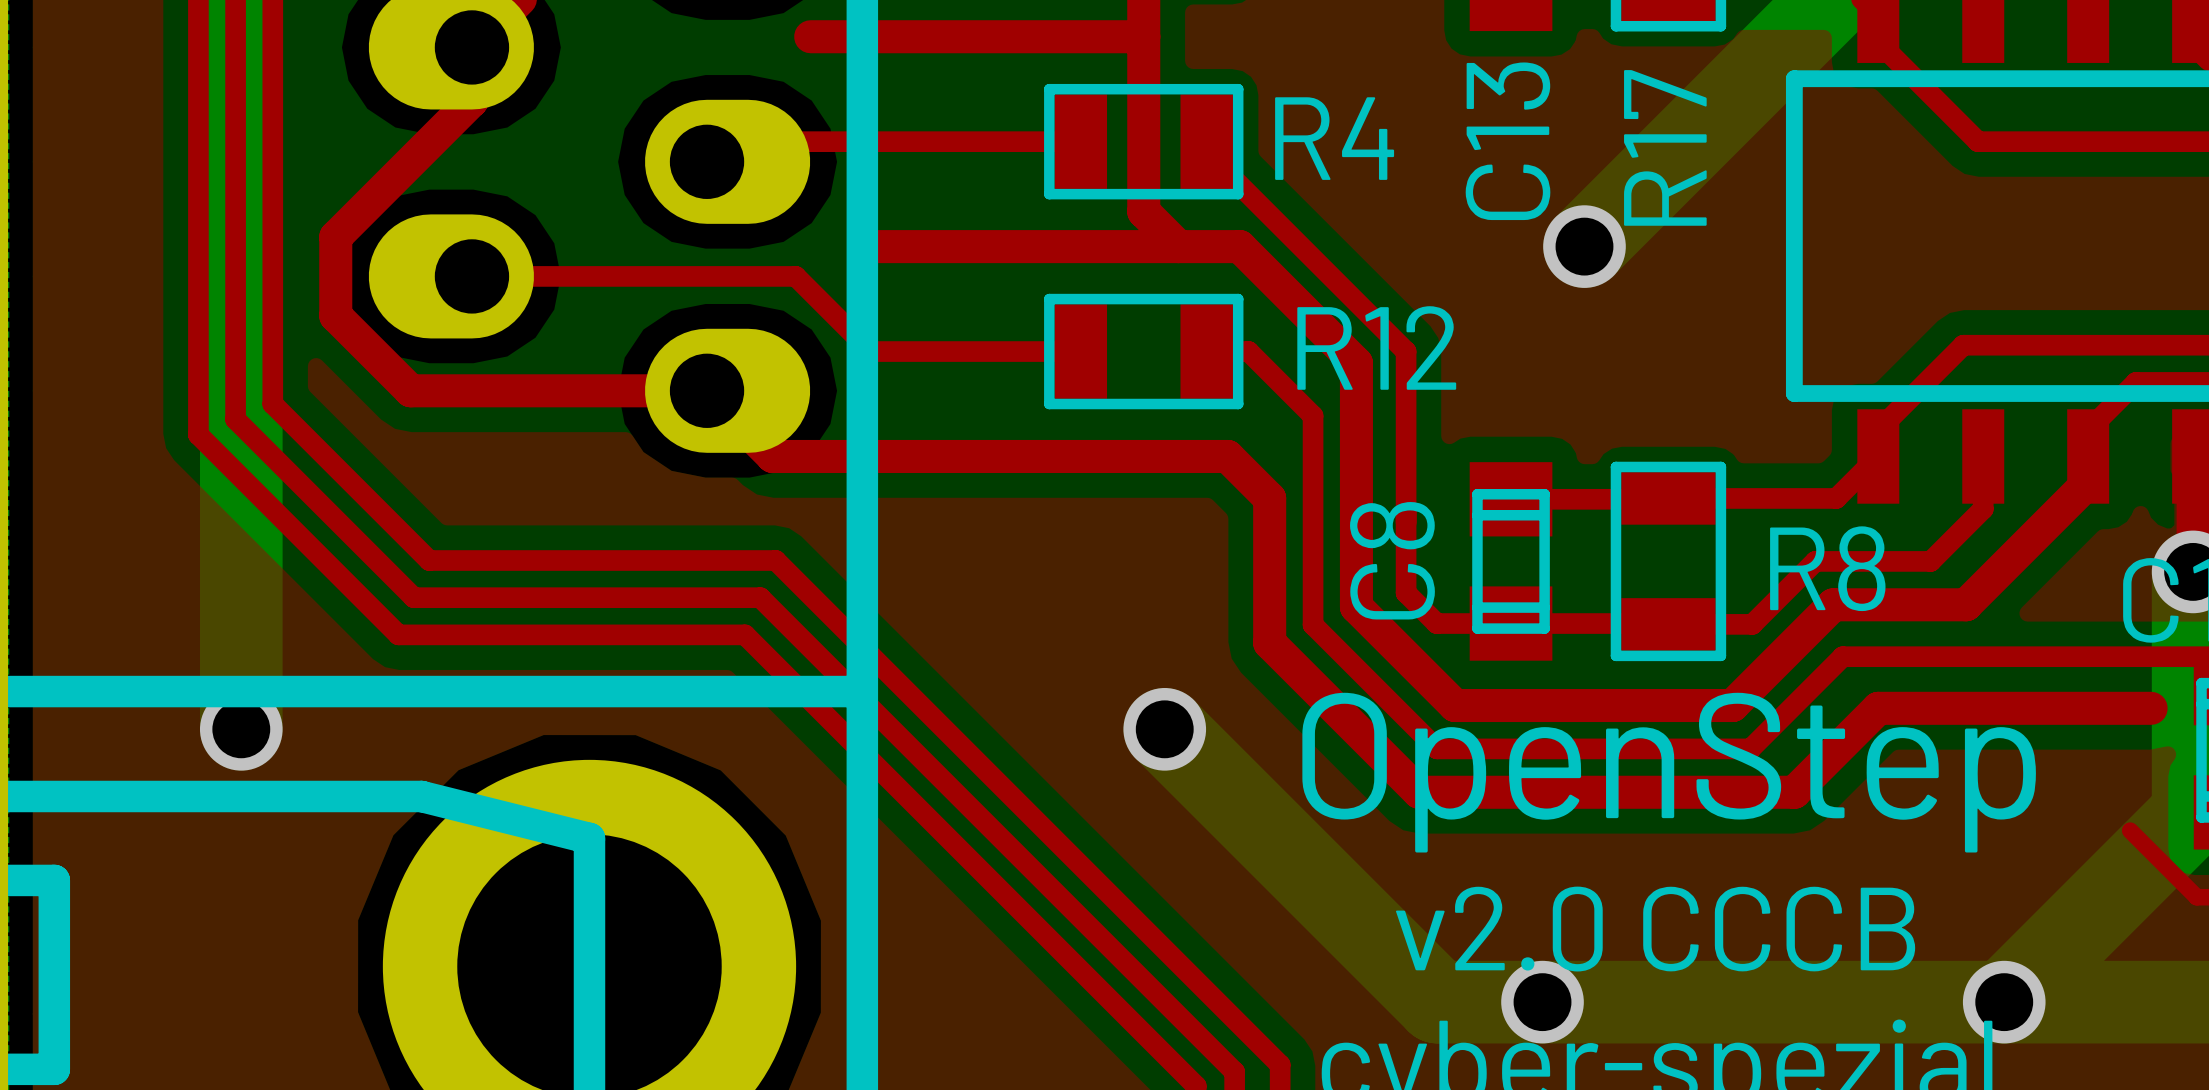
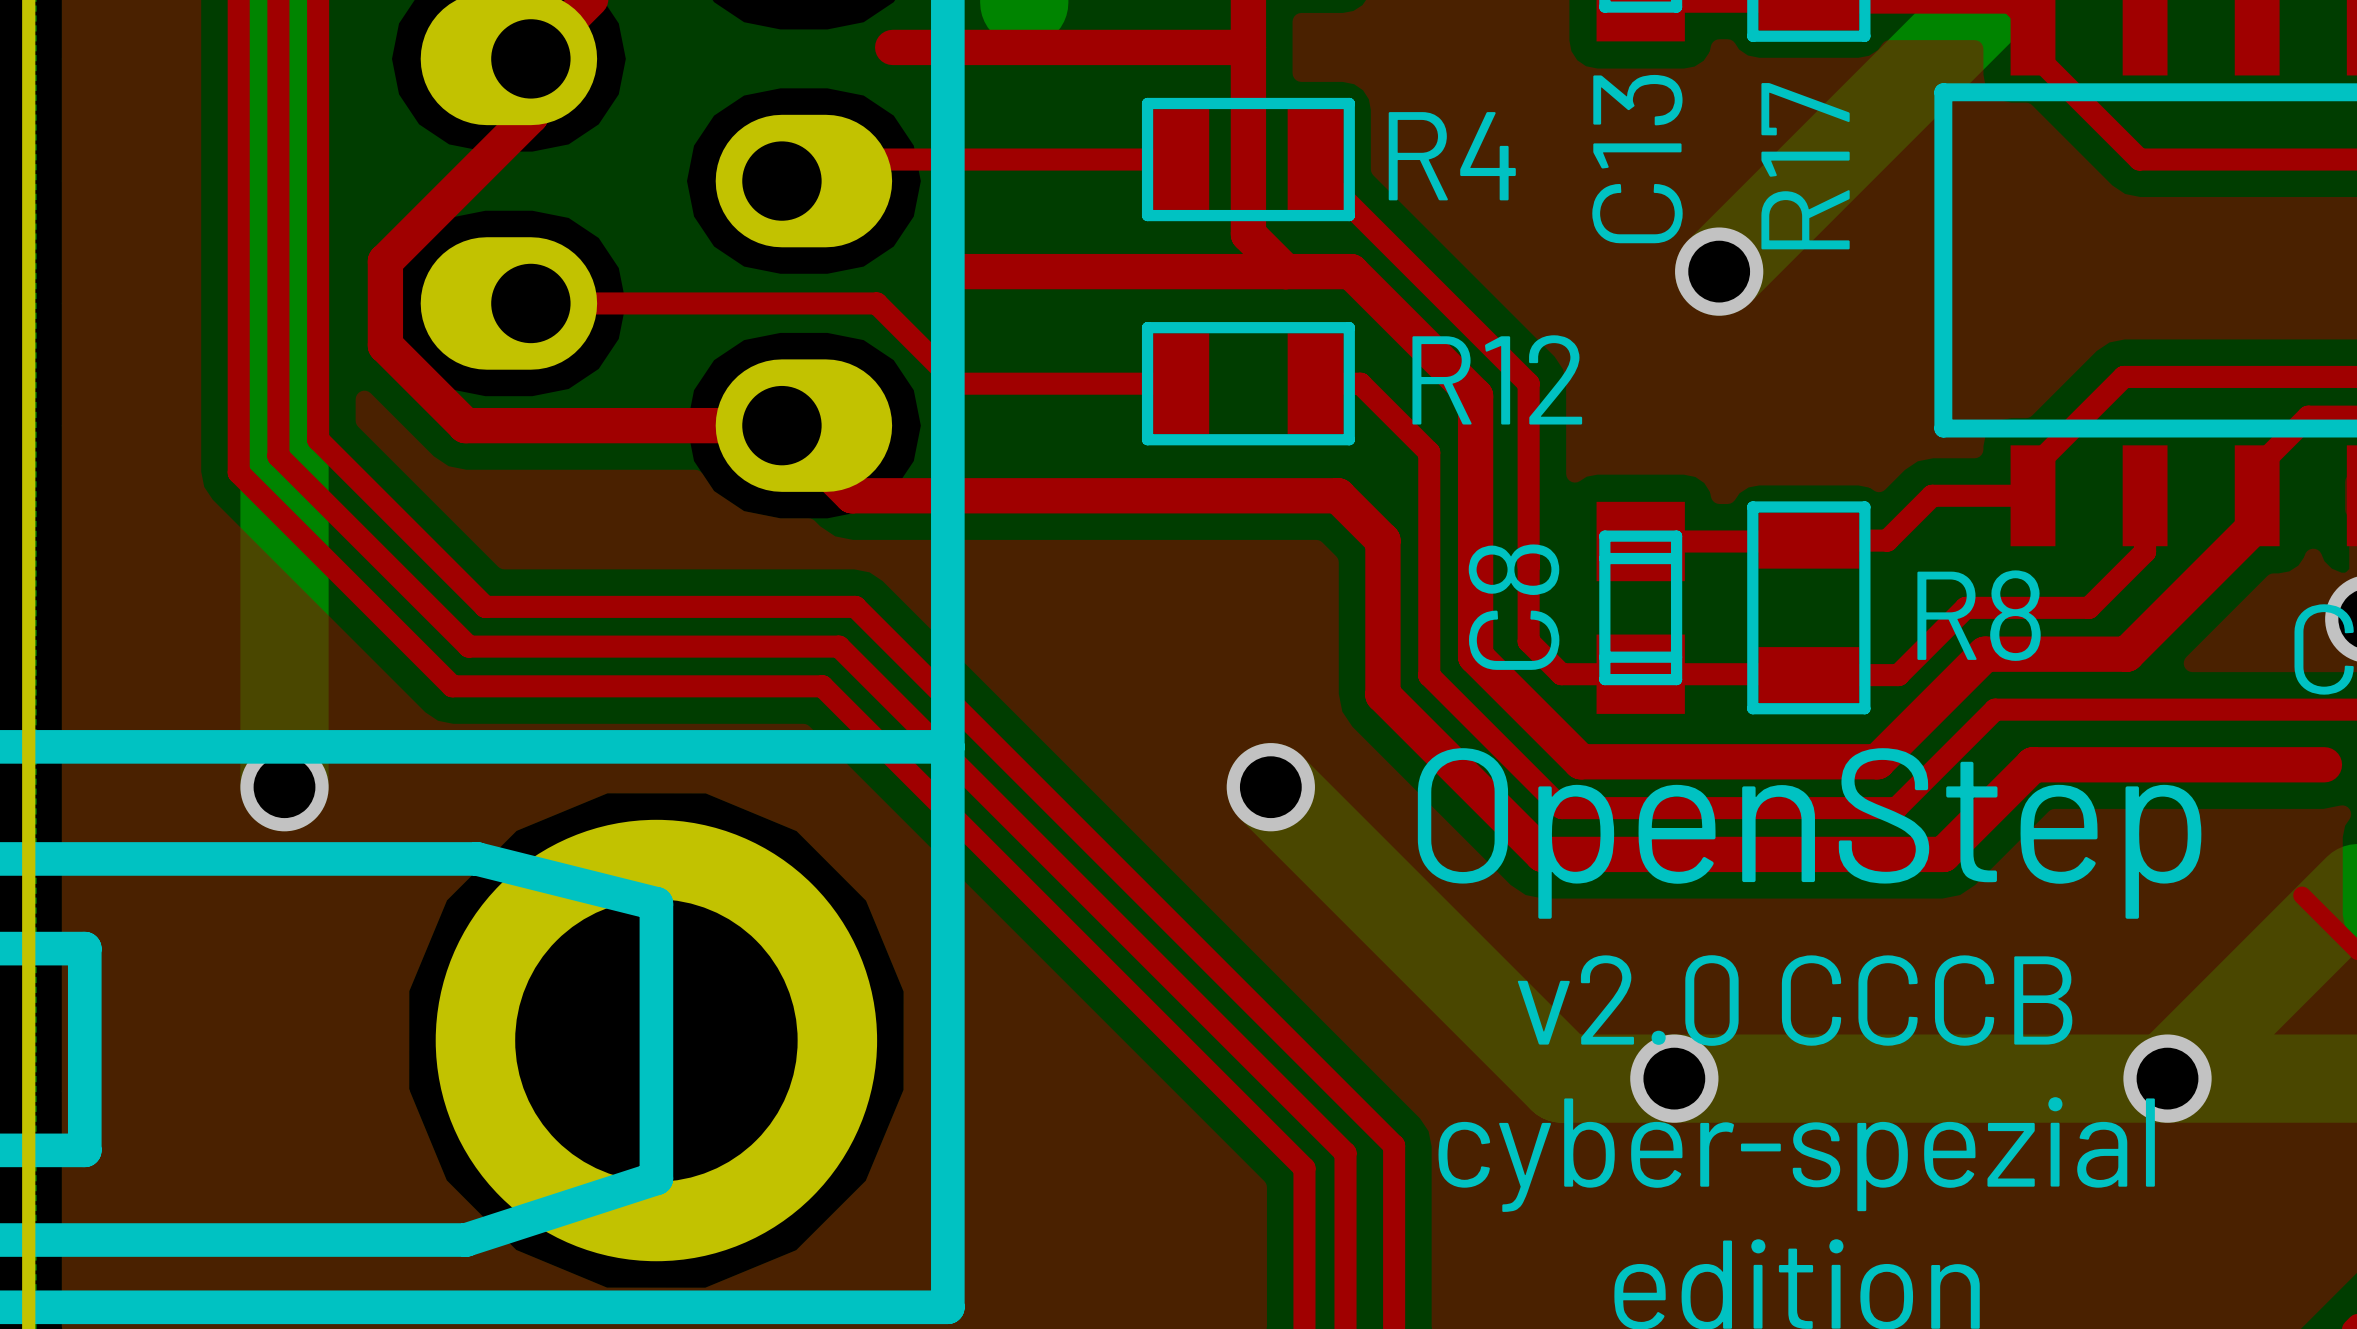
top track: (1878, 456) (1836, 498) (1741, 498) -> (2033, 495) (1932, 495) (1887, 540)

